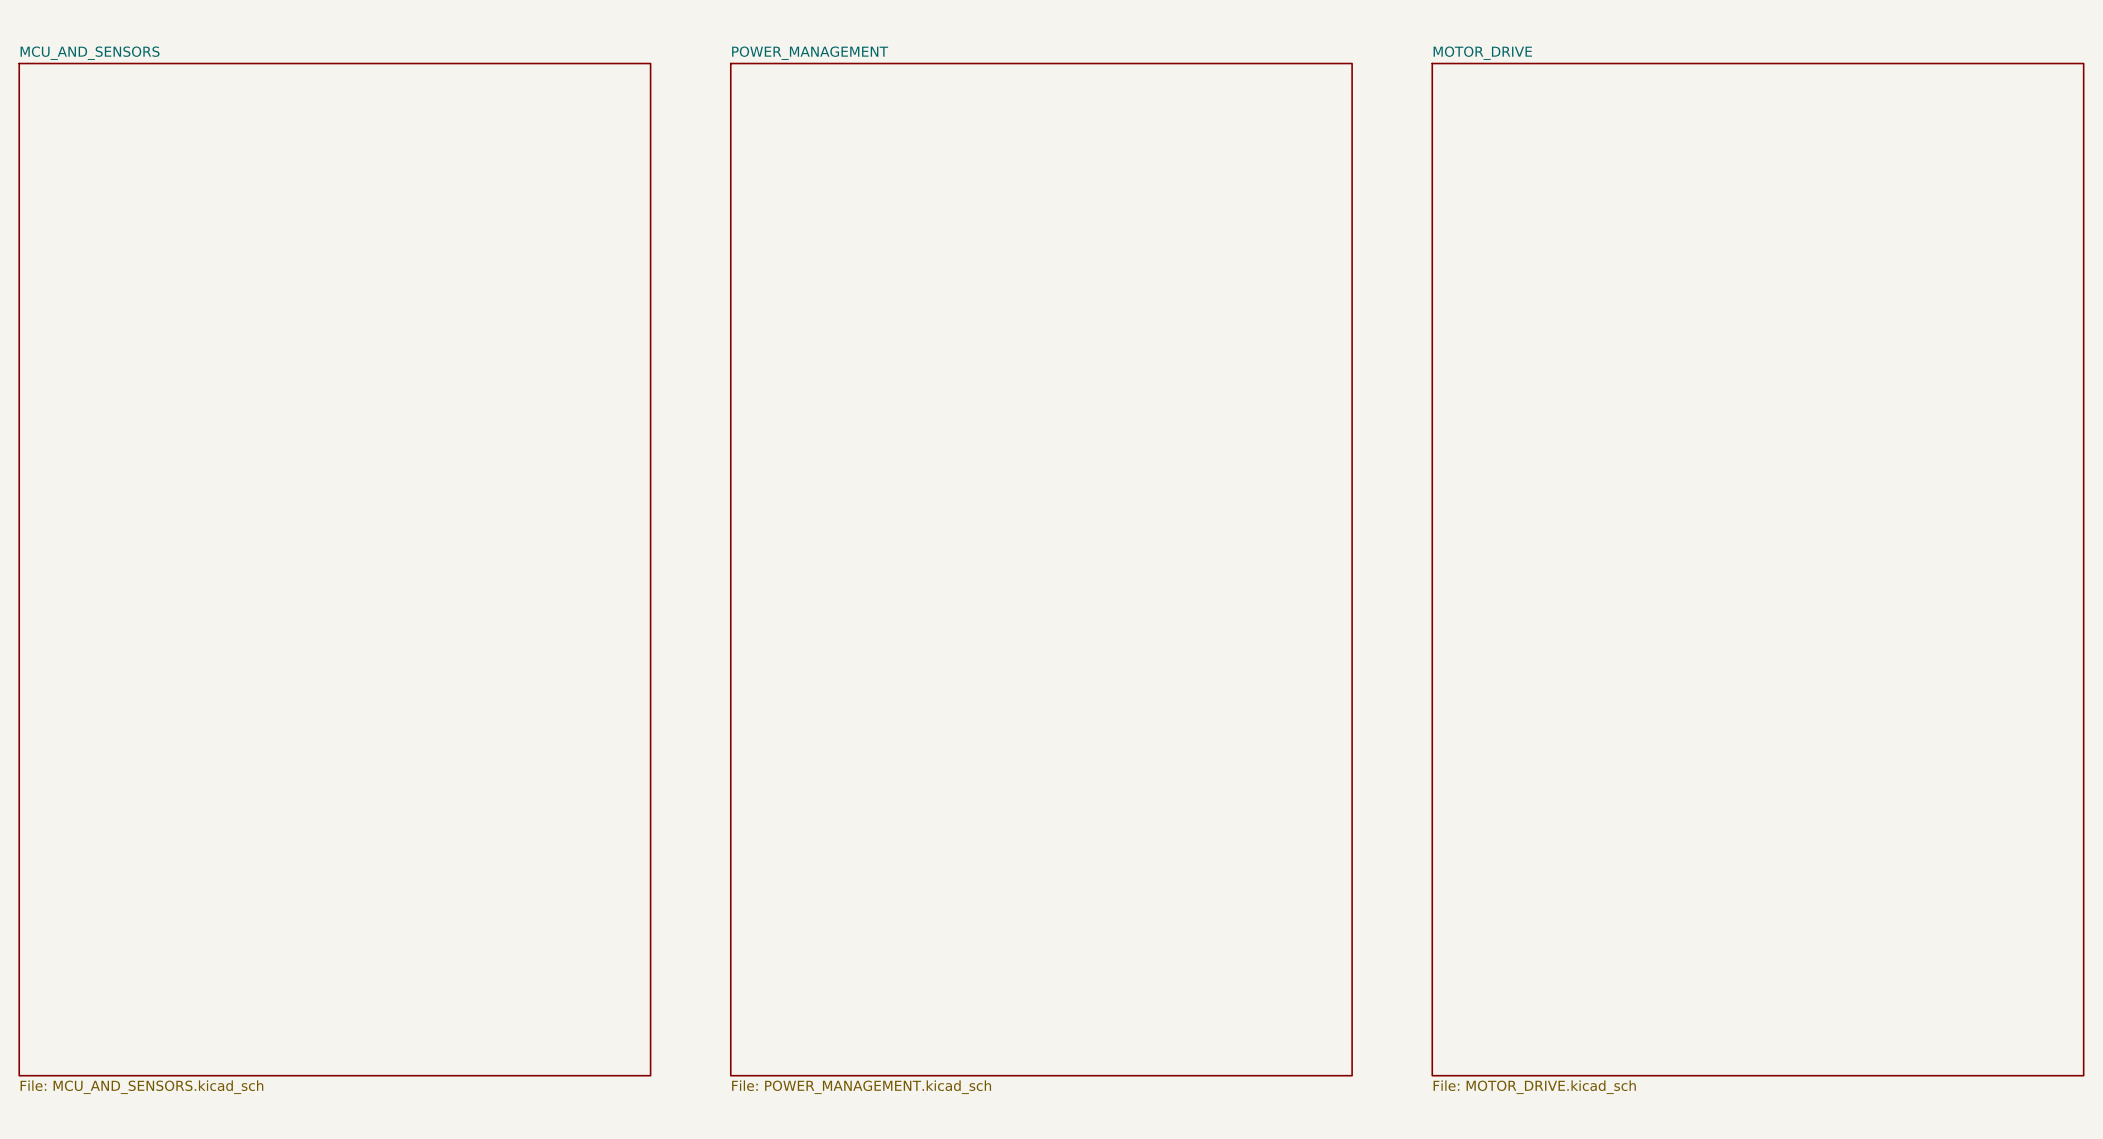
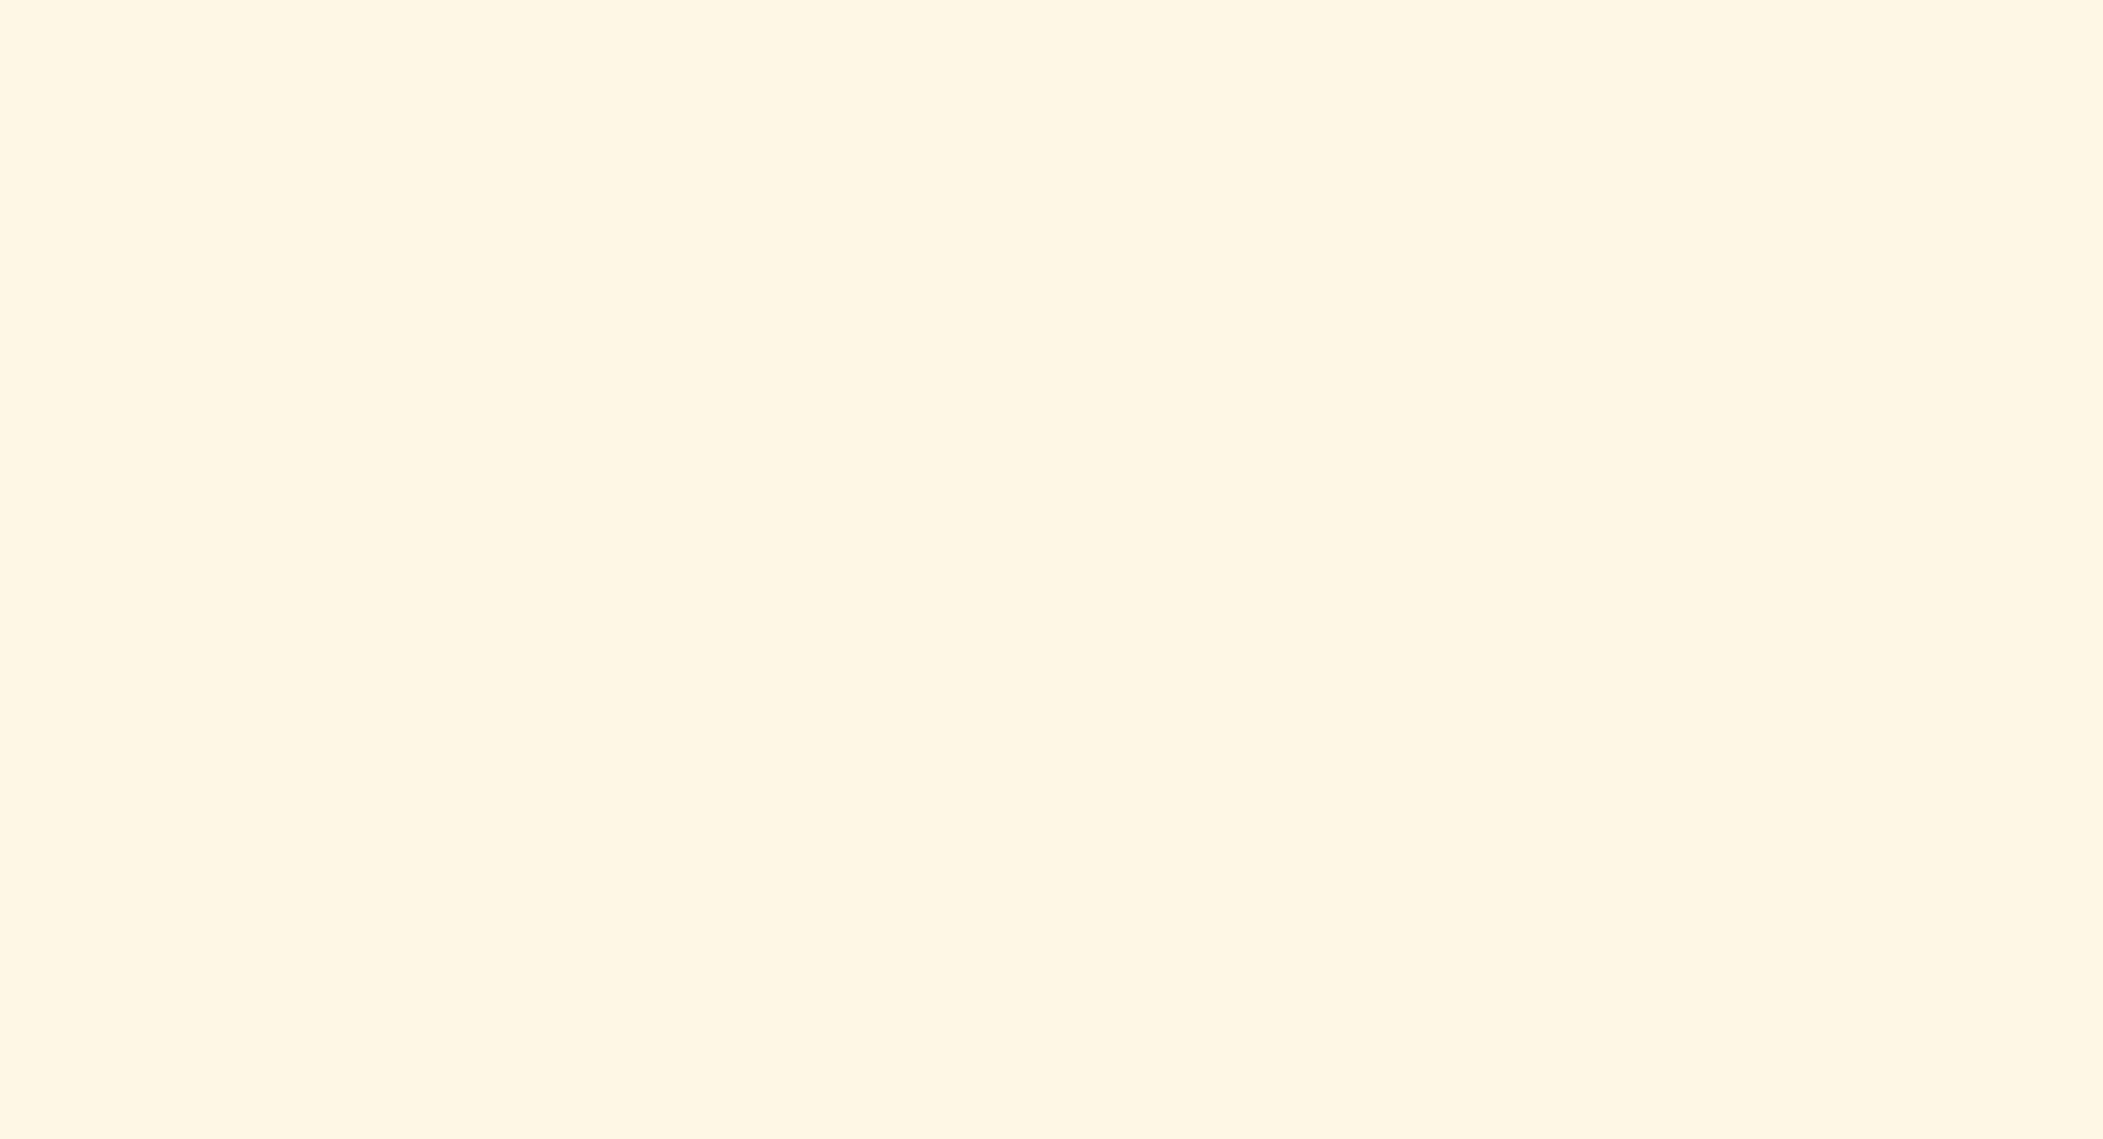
sheet MCU_AND_SENSORS: File: MCU_AND_SENSORS.kicad_sch (334, 569) -> none
sheet POWER_MANAGEMENT: File: POWER_MANAGEMENT.kicad_sch (1041, 569) -> none
sheet MOTOR_DRIVE: File: MOTOR_DRIVE.kicad_sch (1757, 569) -> none

